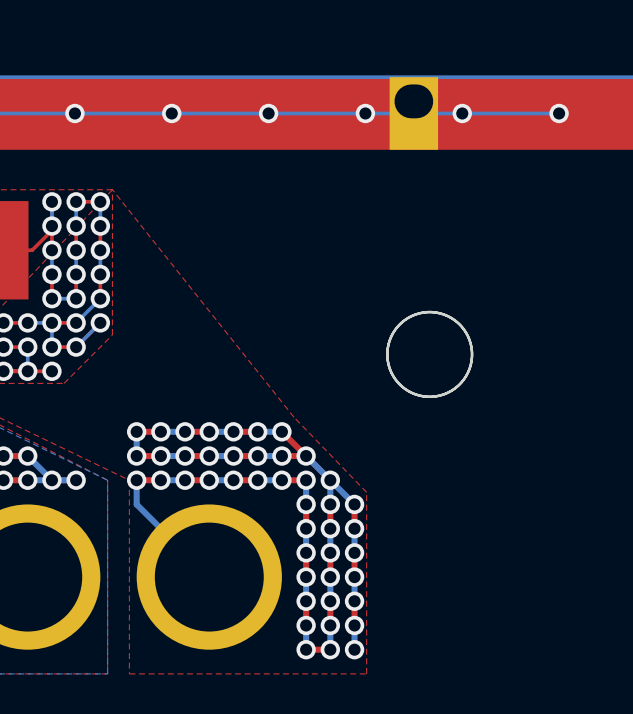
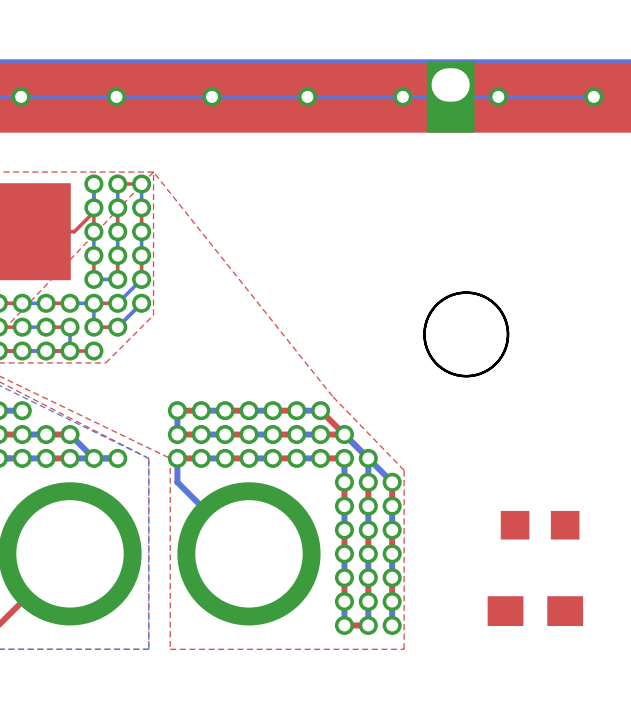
part: none -> (540, 525)
part: none -> (535, 611)

